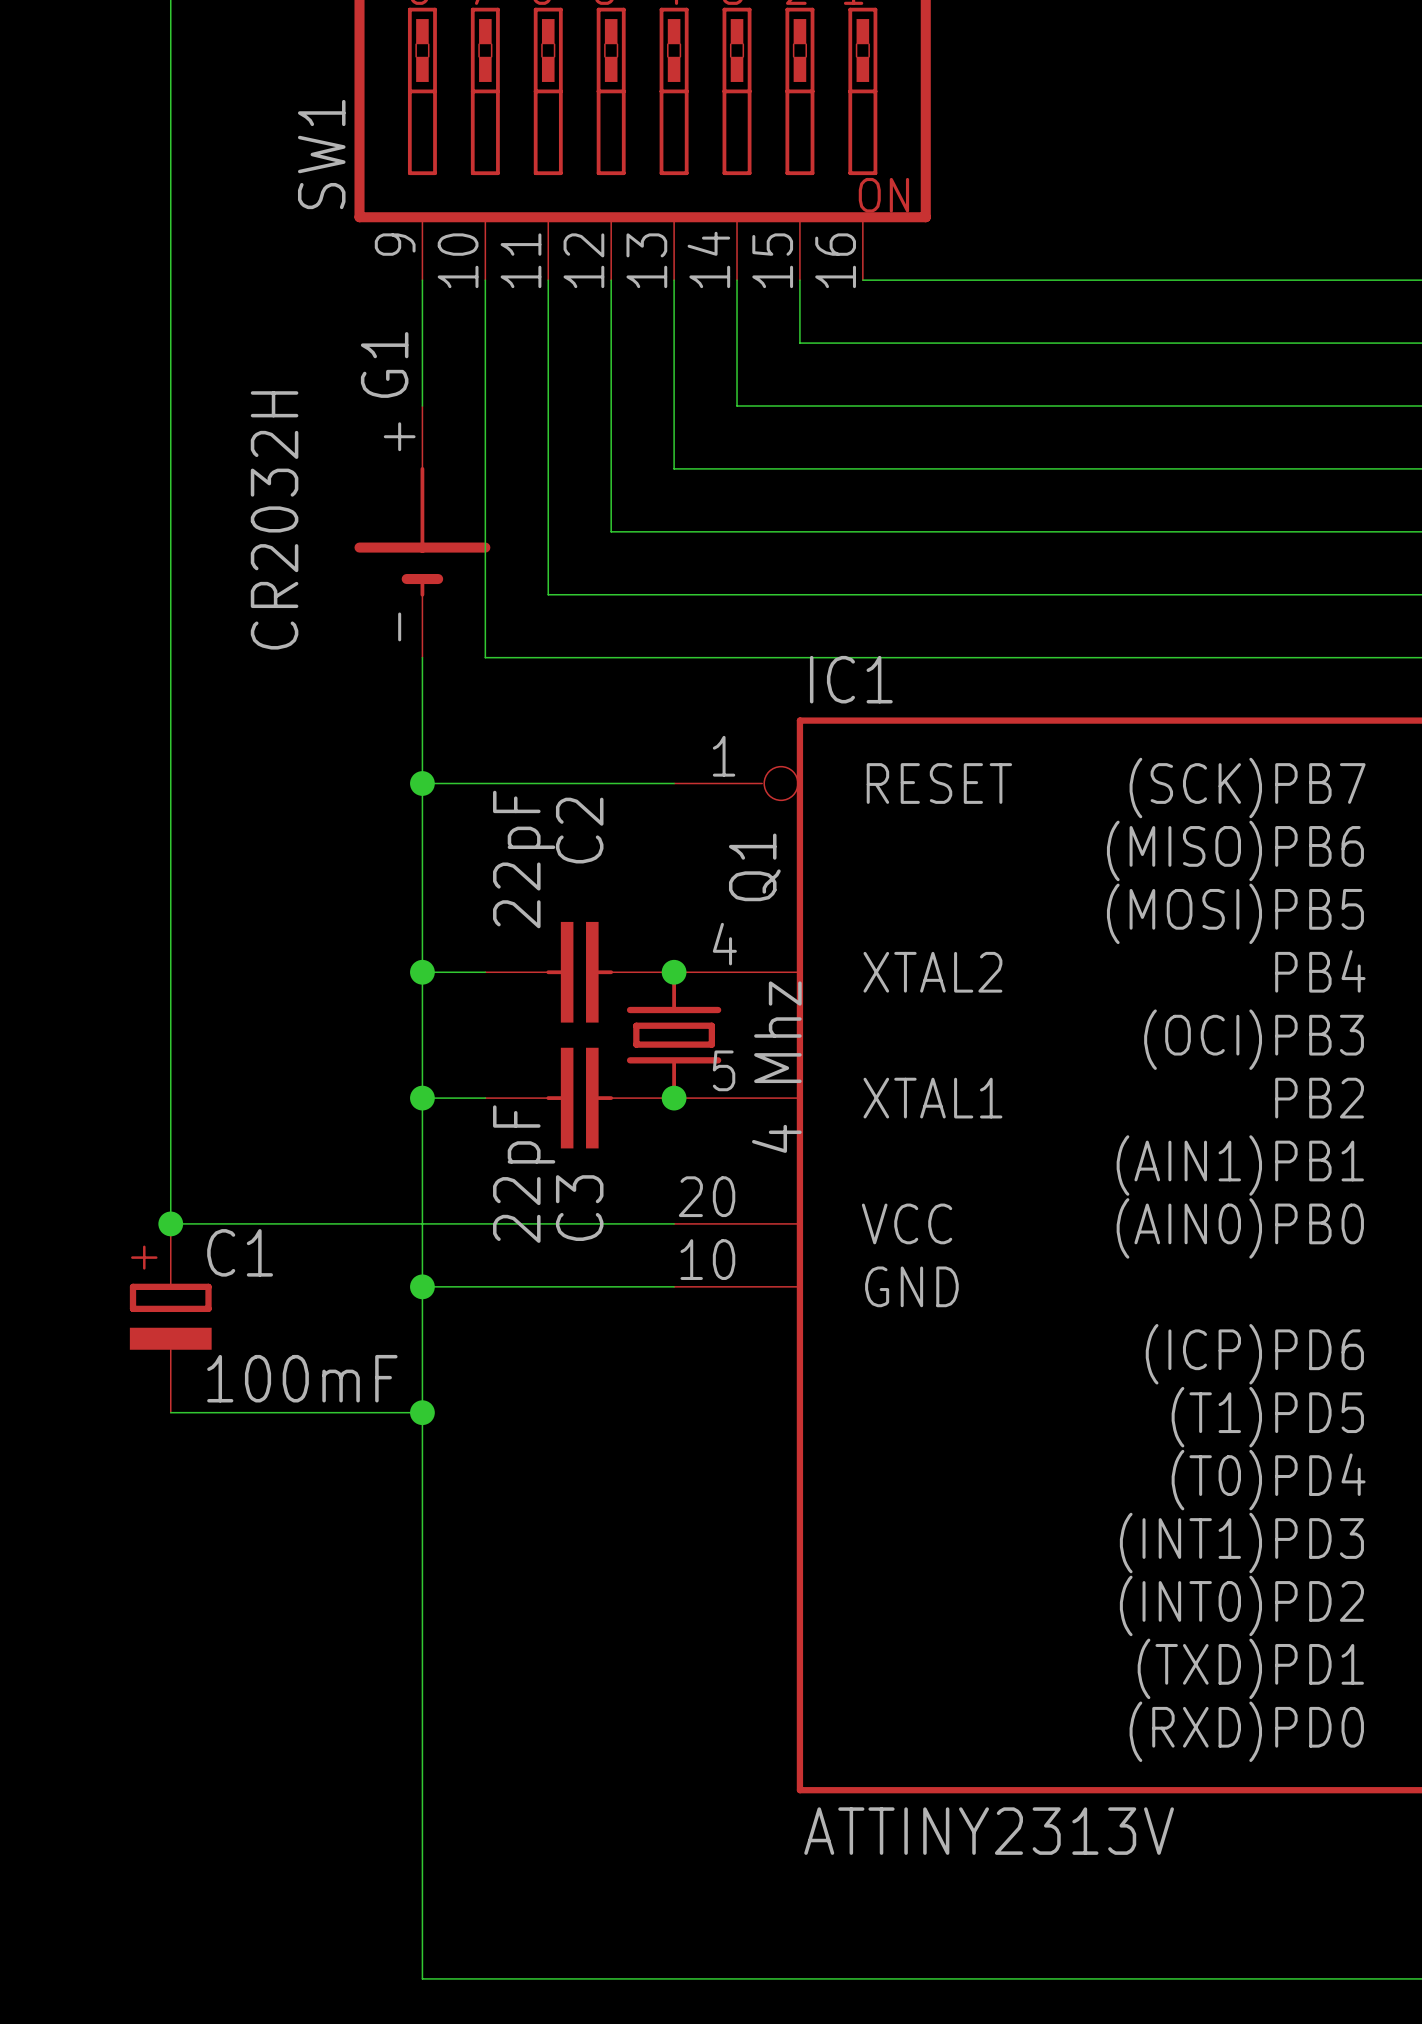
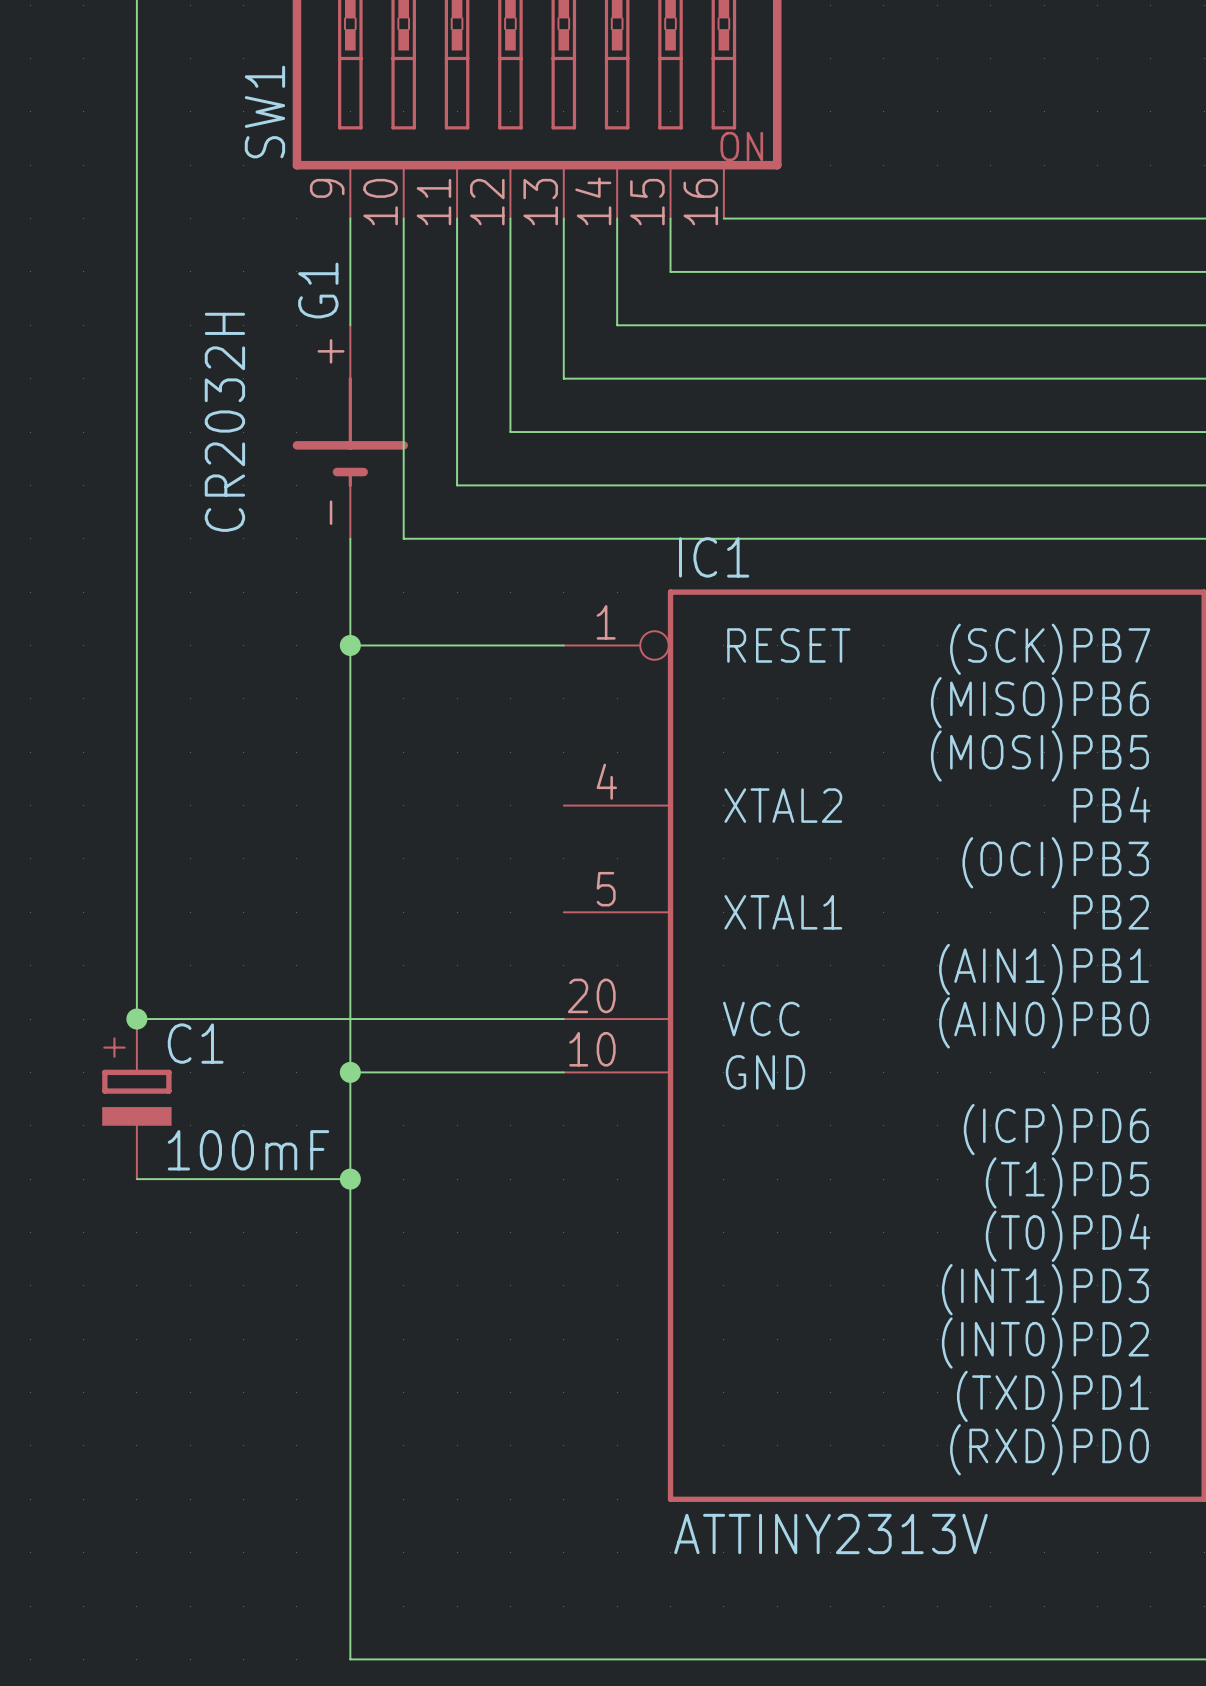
wire: (422, 972) (485, 972) -> none
junction: (422, 972) -> none
C2: 22pF (579, 972) -> none
junction: (674, 972) -> none
Q1: 4 Mhz (674, 1035) -> none
wire: (422, 1098) (485, 1098) -> none
junction: (422, 1098) -> none
C3: 22pF (579, 1098) -> none
junction: (674, 1098) -> none

